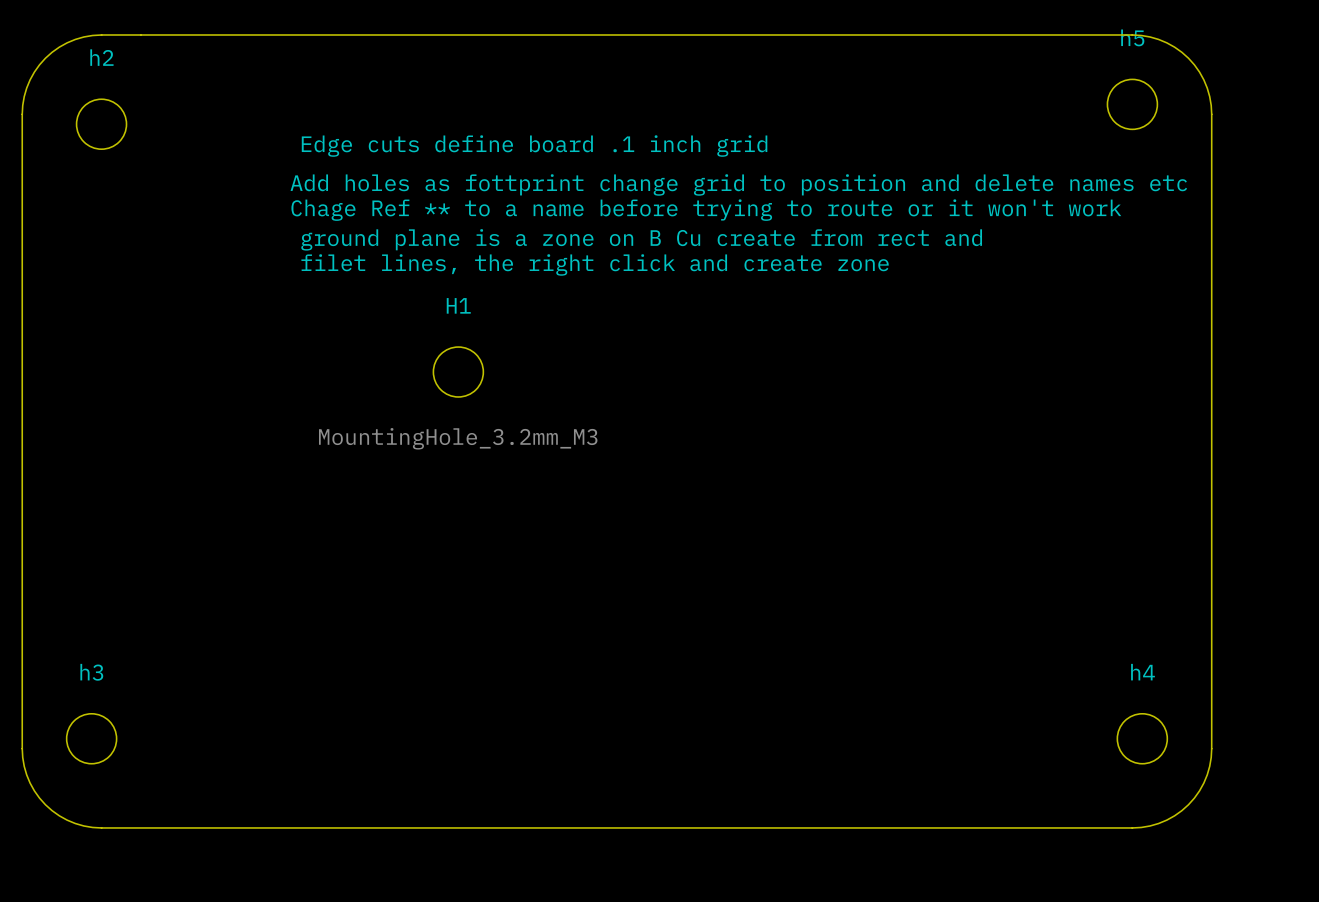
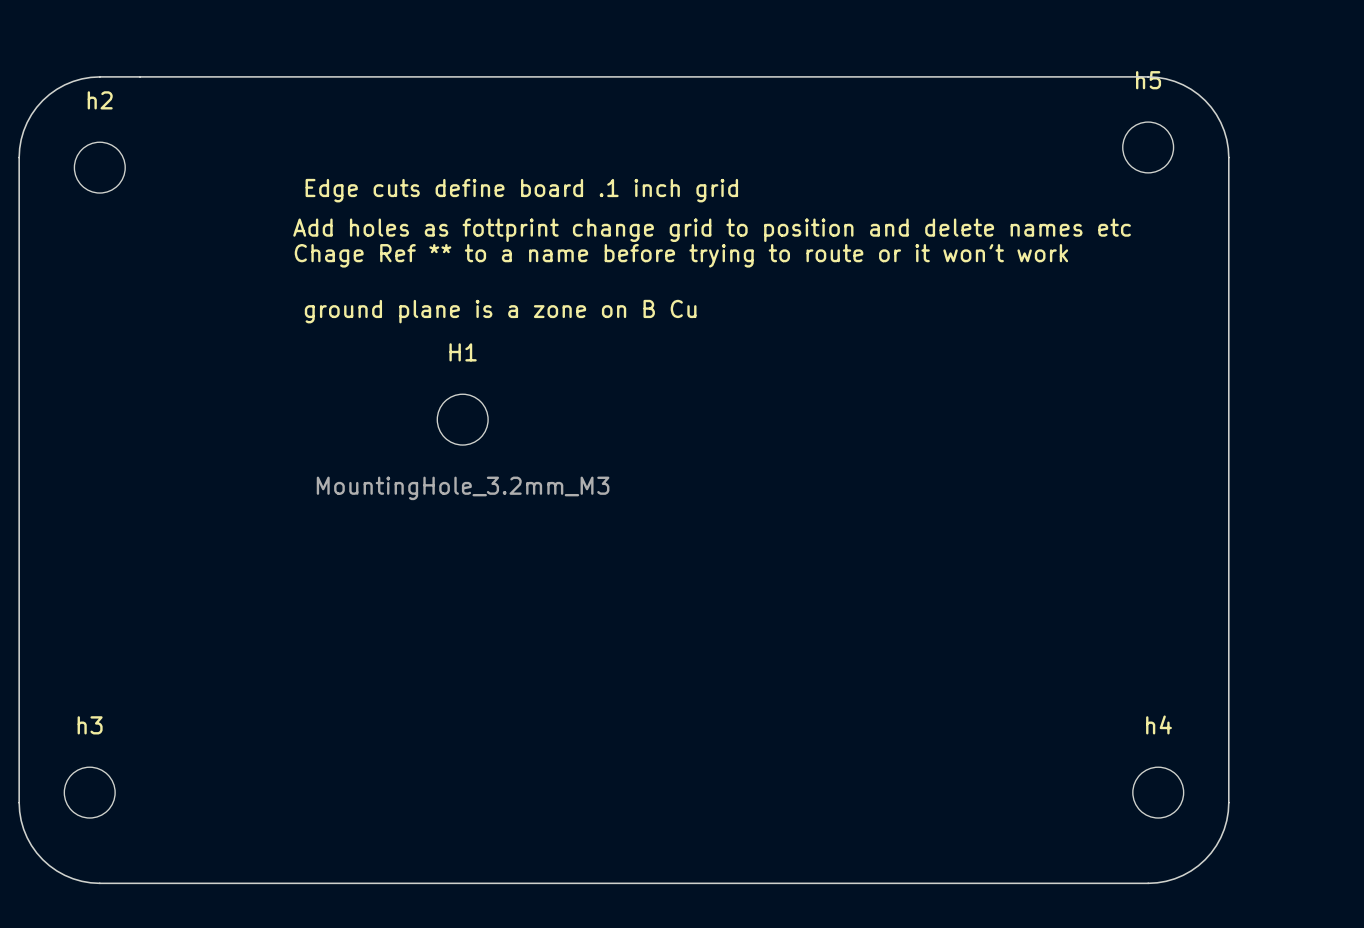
text: ground plane is a zone on B Cu create from rect and (641, 239) -> none
text: filet lines, the right click and create zone (595, 264) -> ground plane is a zone on B Cu (500, 311)

